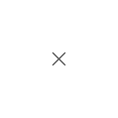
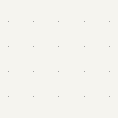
no-connect mark: (58, 58) -> none

